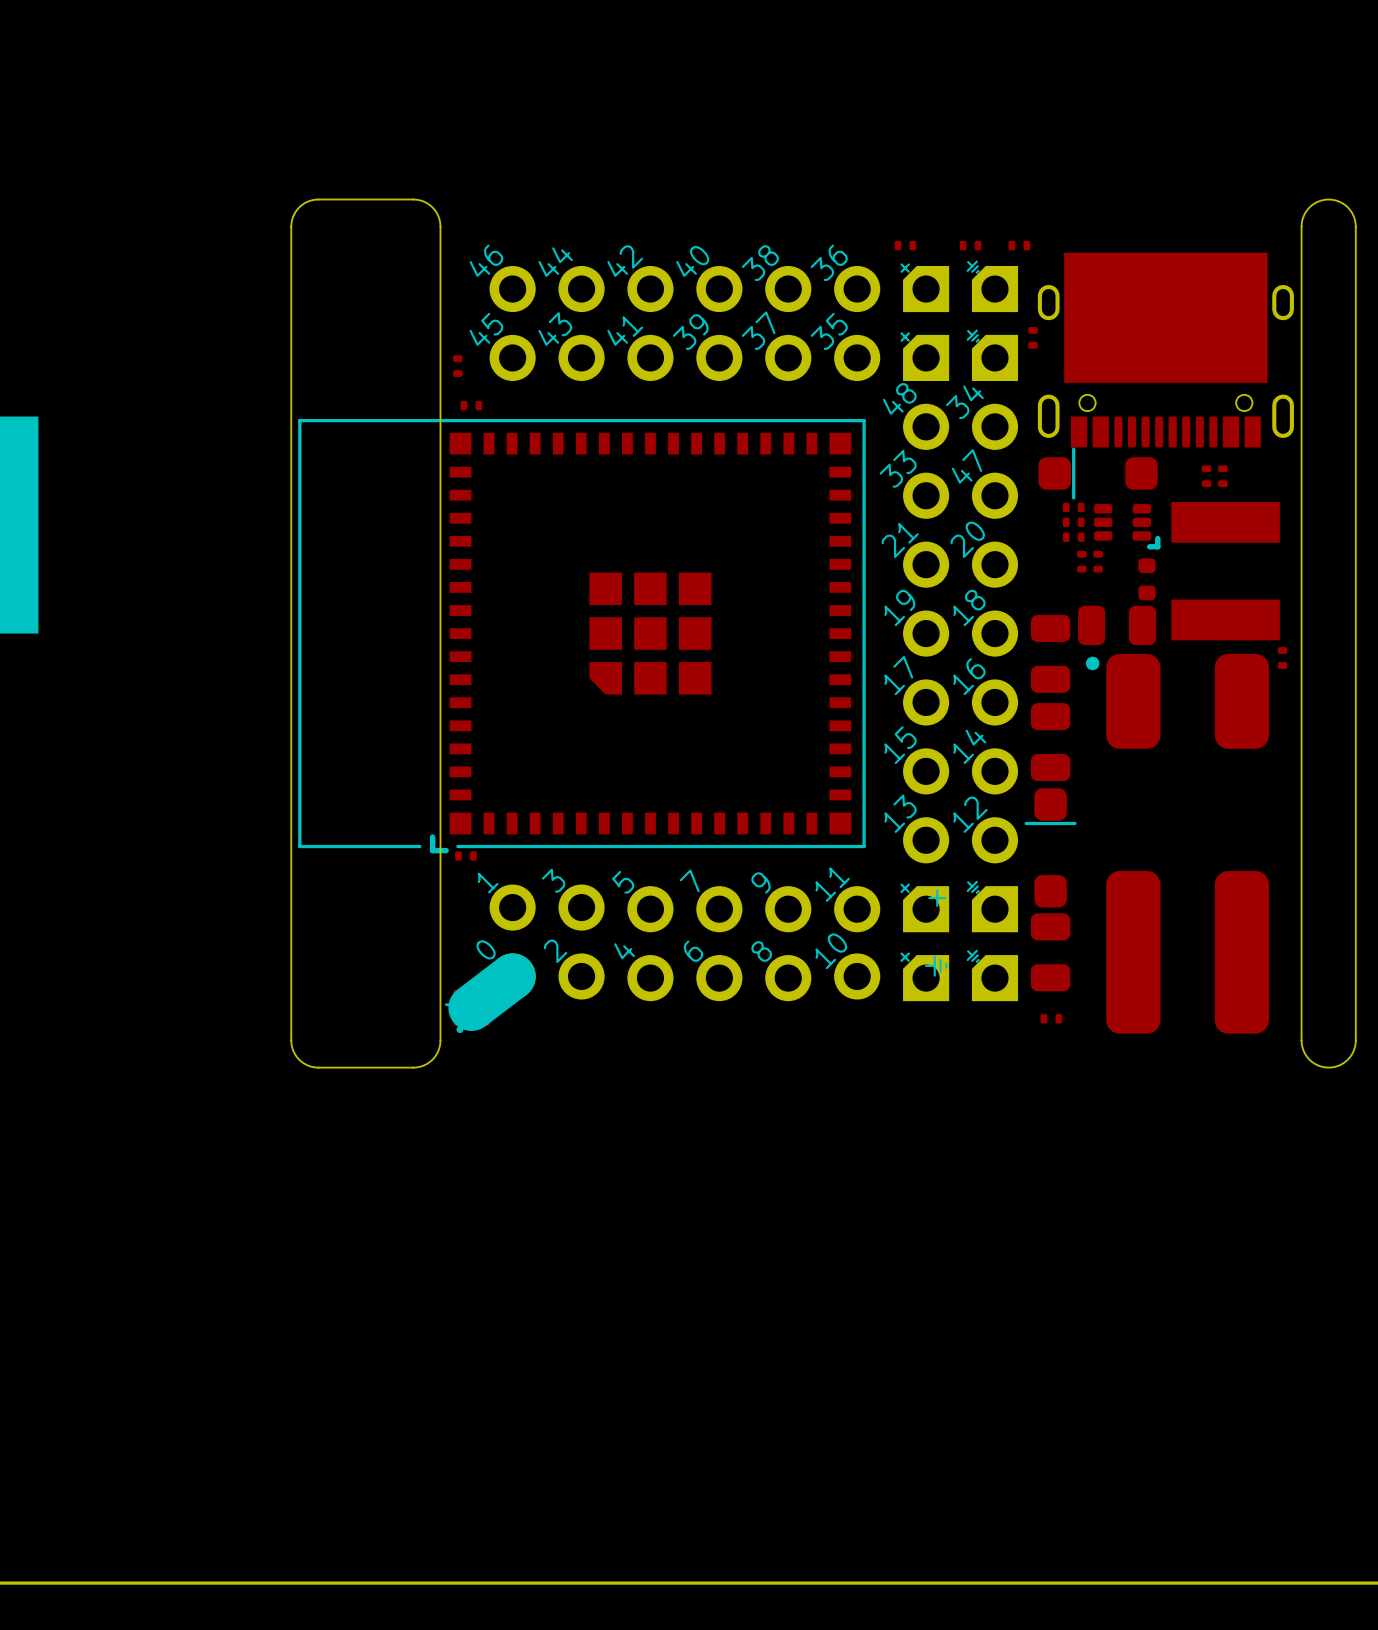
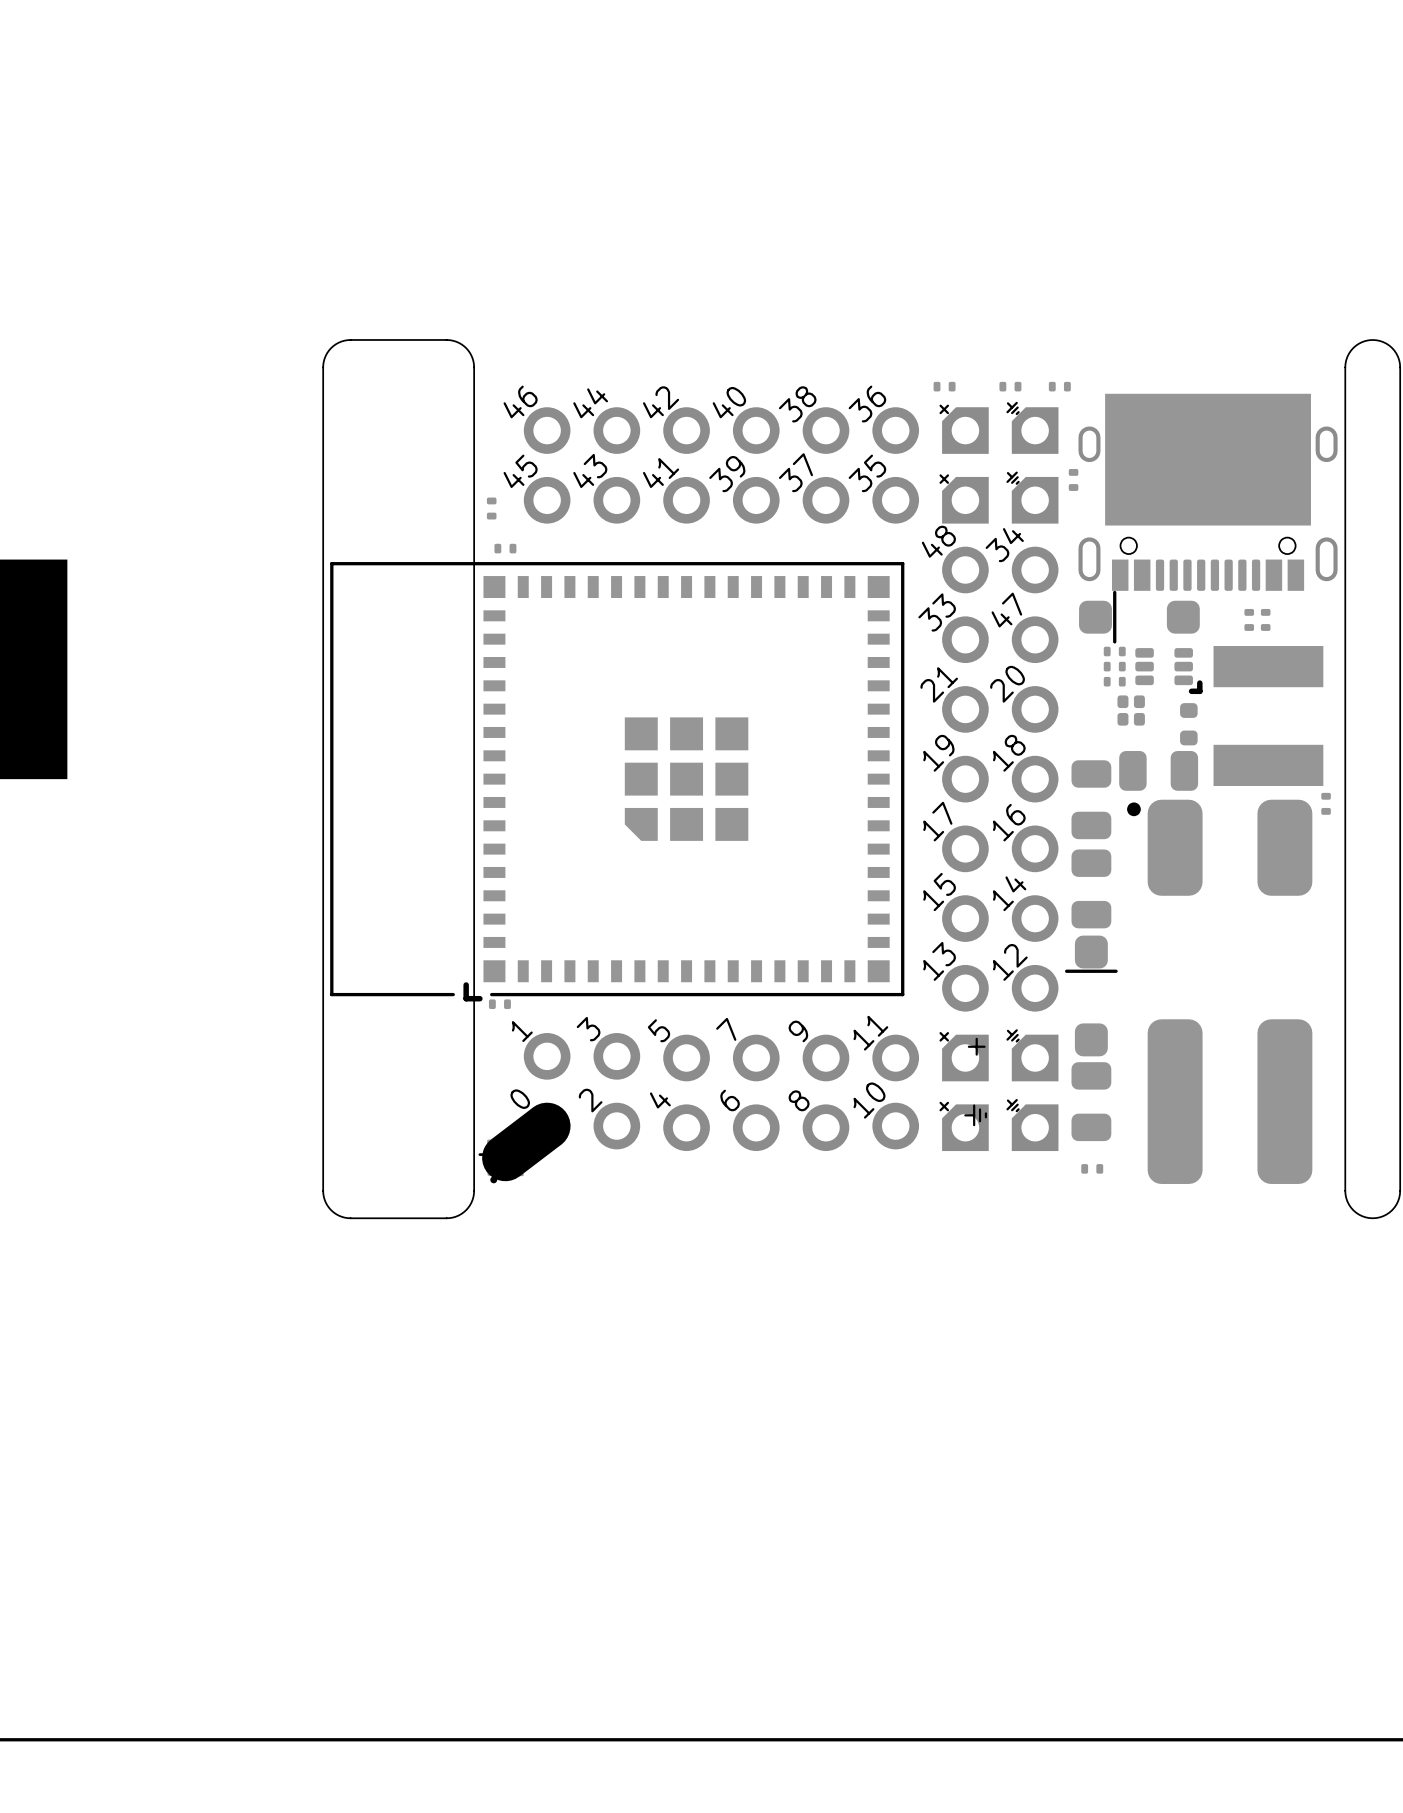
part footprint: [1077, 550, 1087, 573] -> [1117, 695, 1129, 726]
part footprint: [1093, 550, 1103, 573] -> [1133, 695, 1145, 726]

